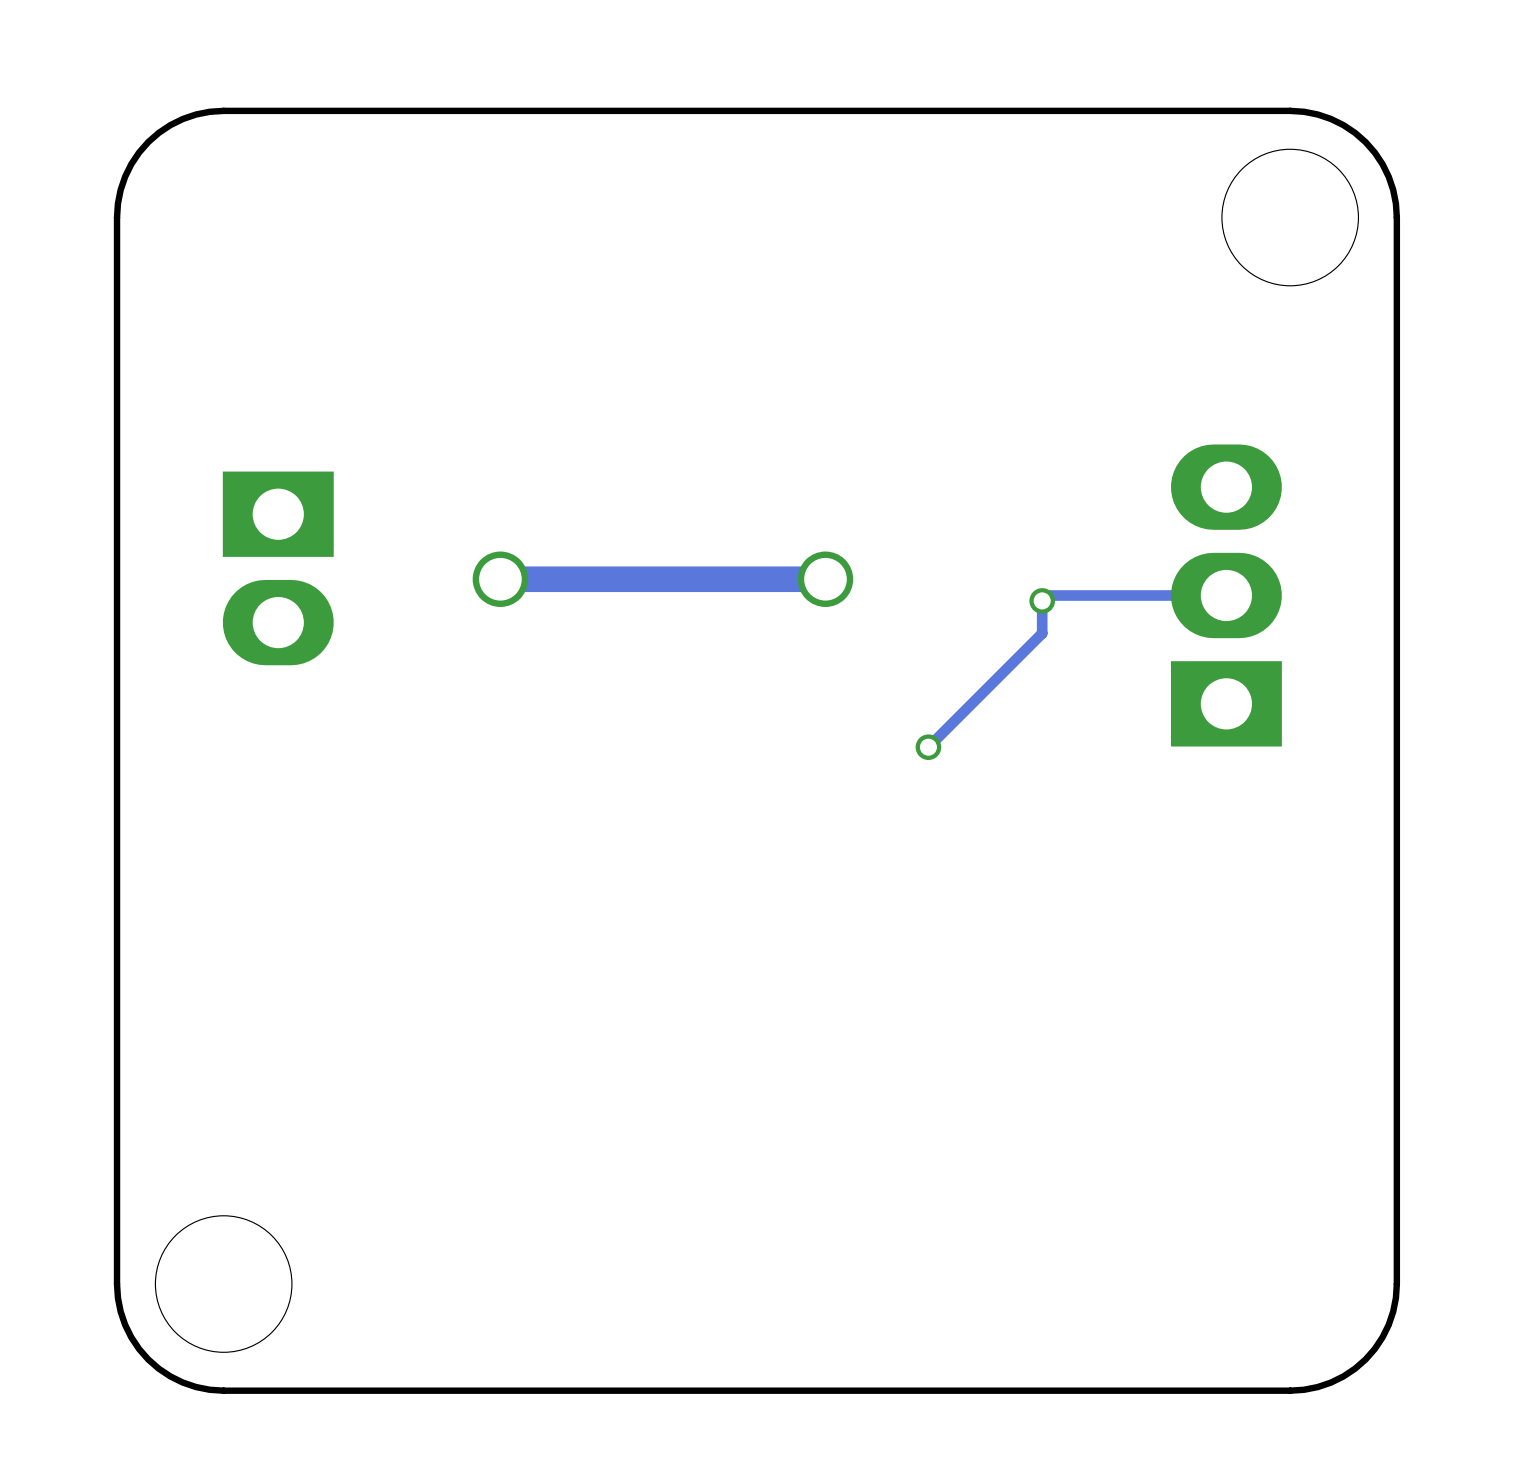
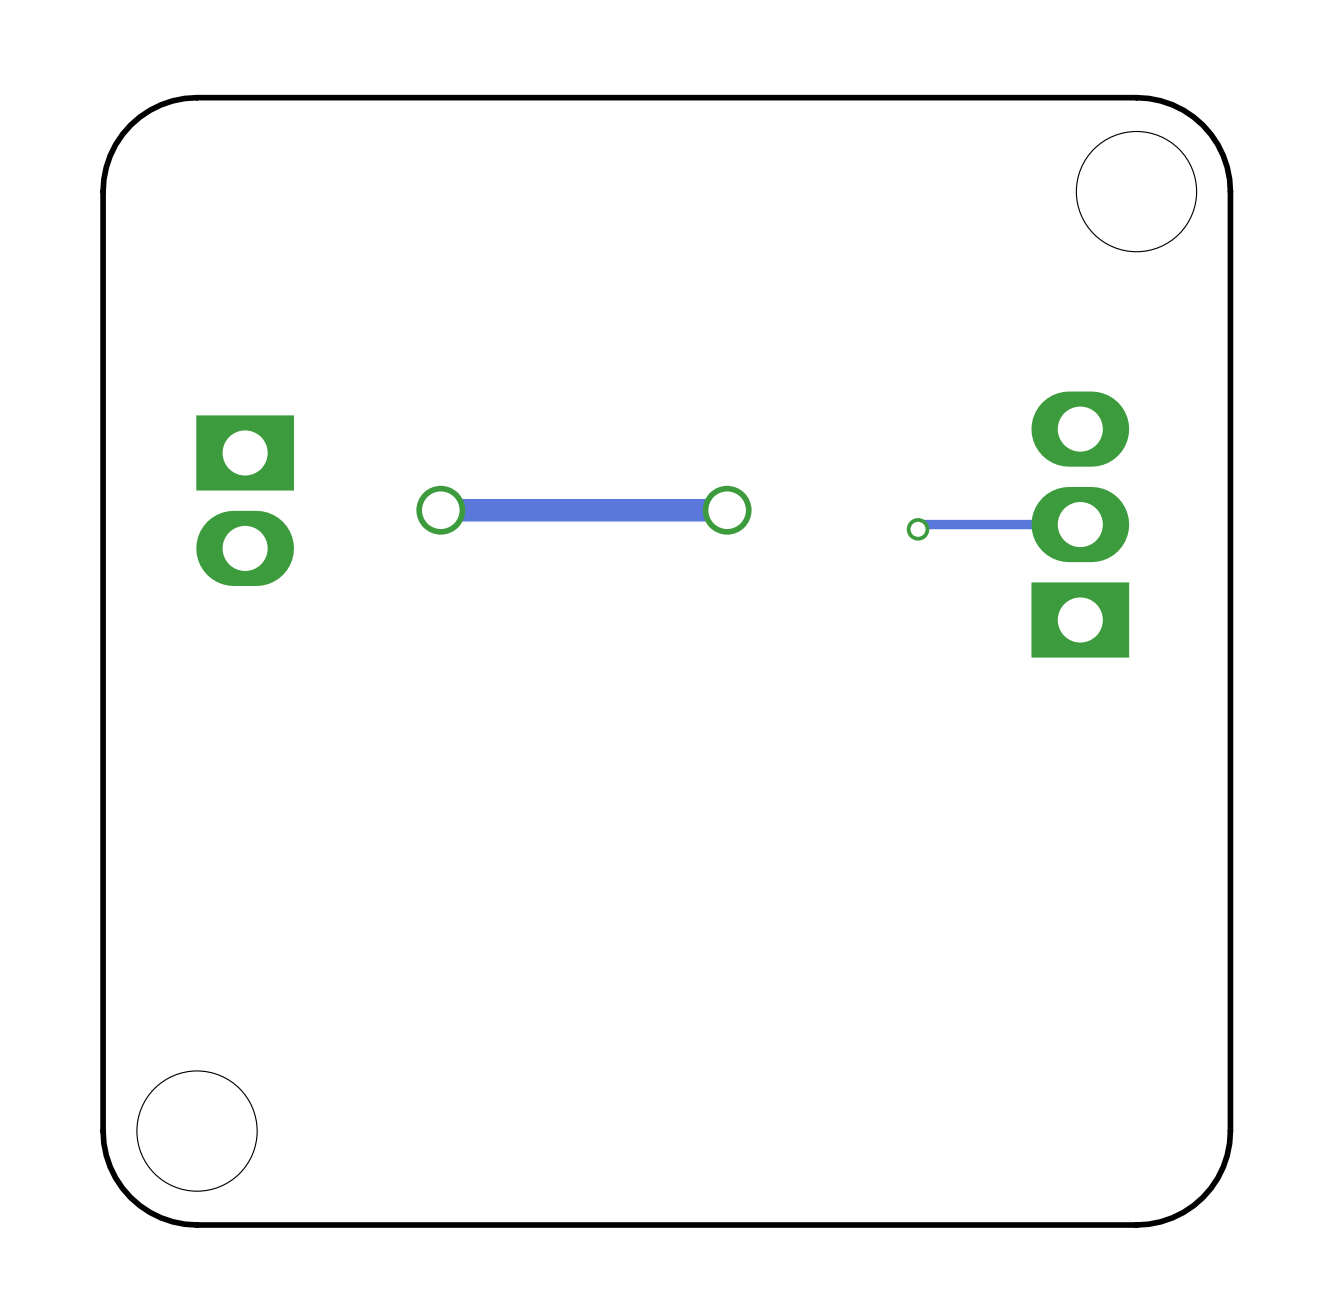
track: (1042, 600) (1042, 633) (928, 747) -> none
via: (928, 747) -> none

